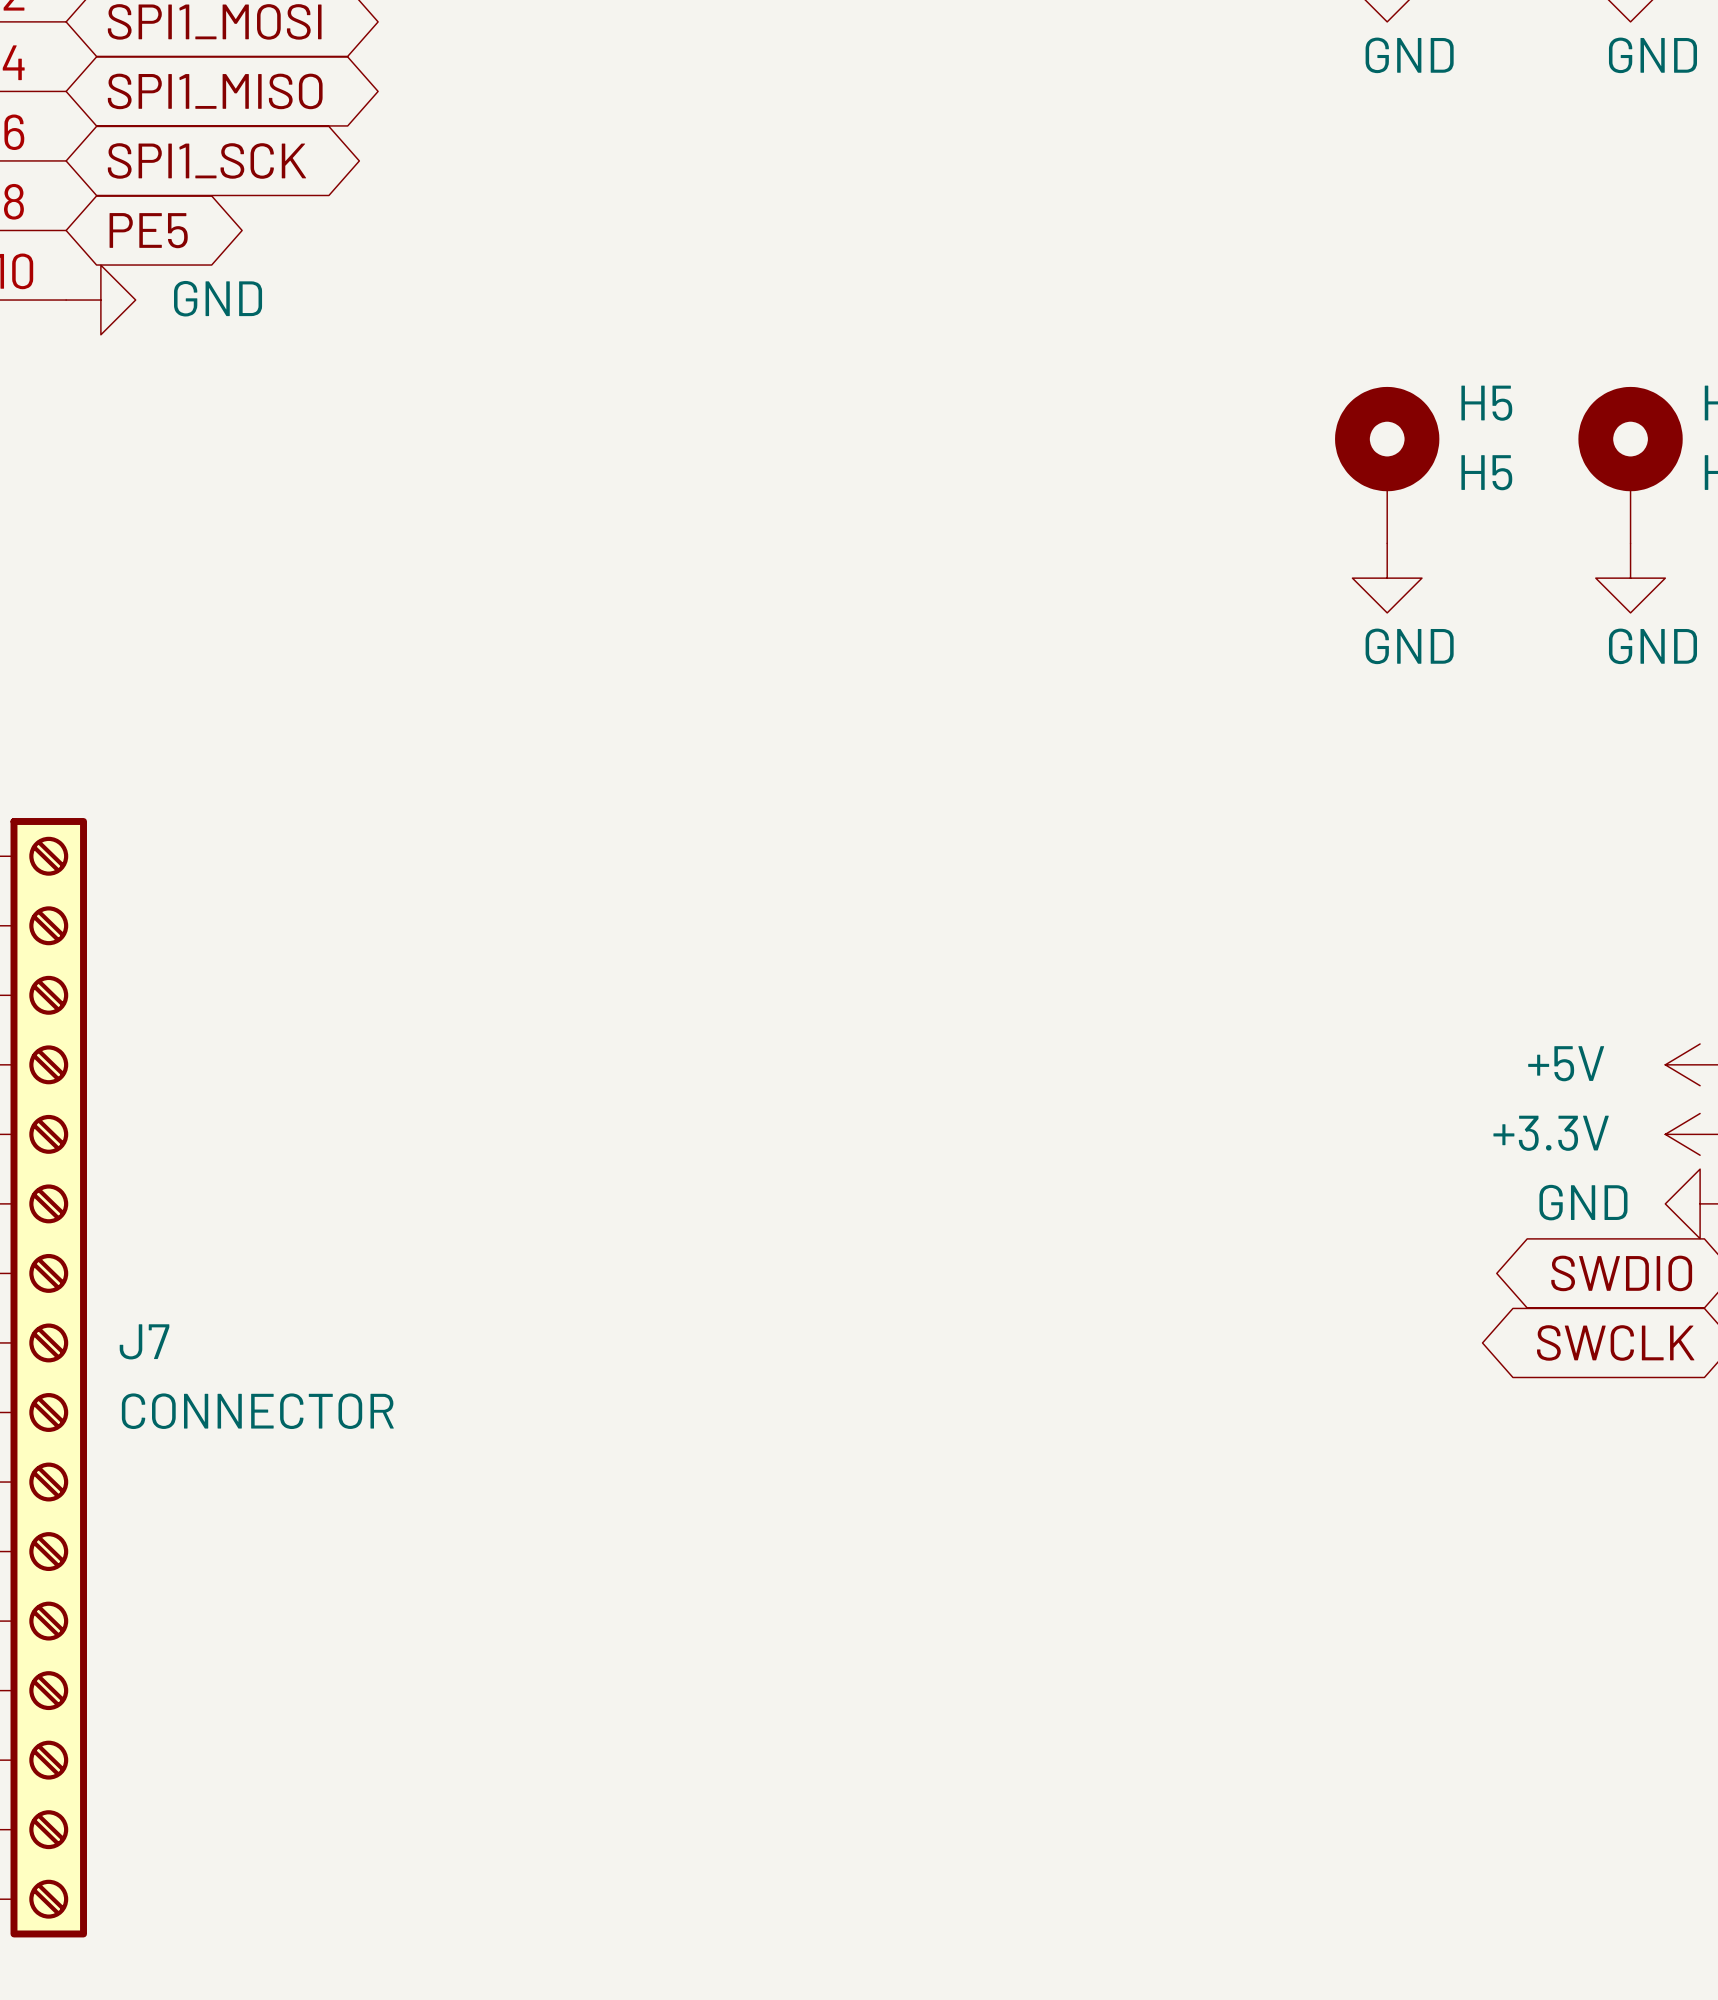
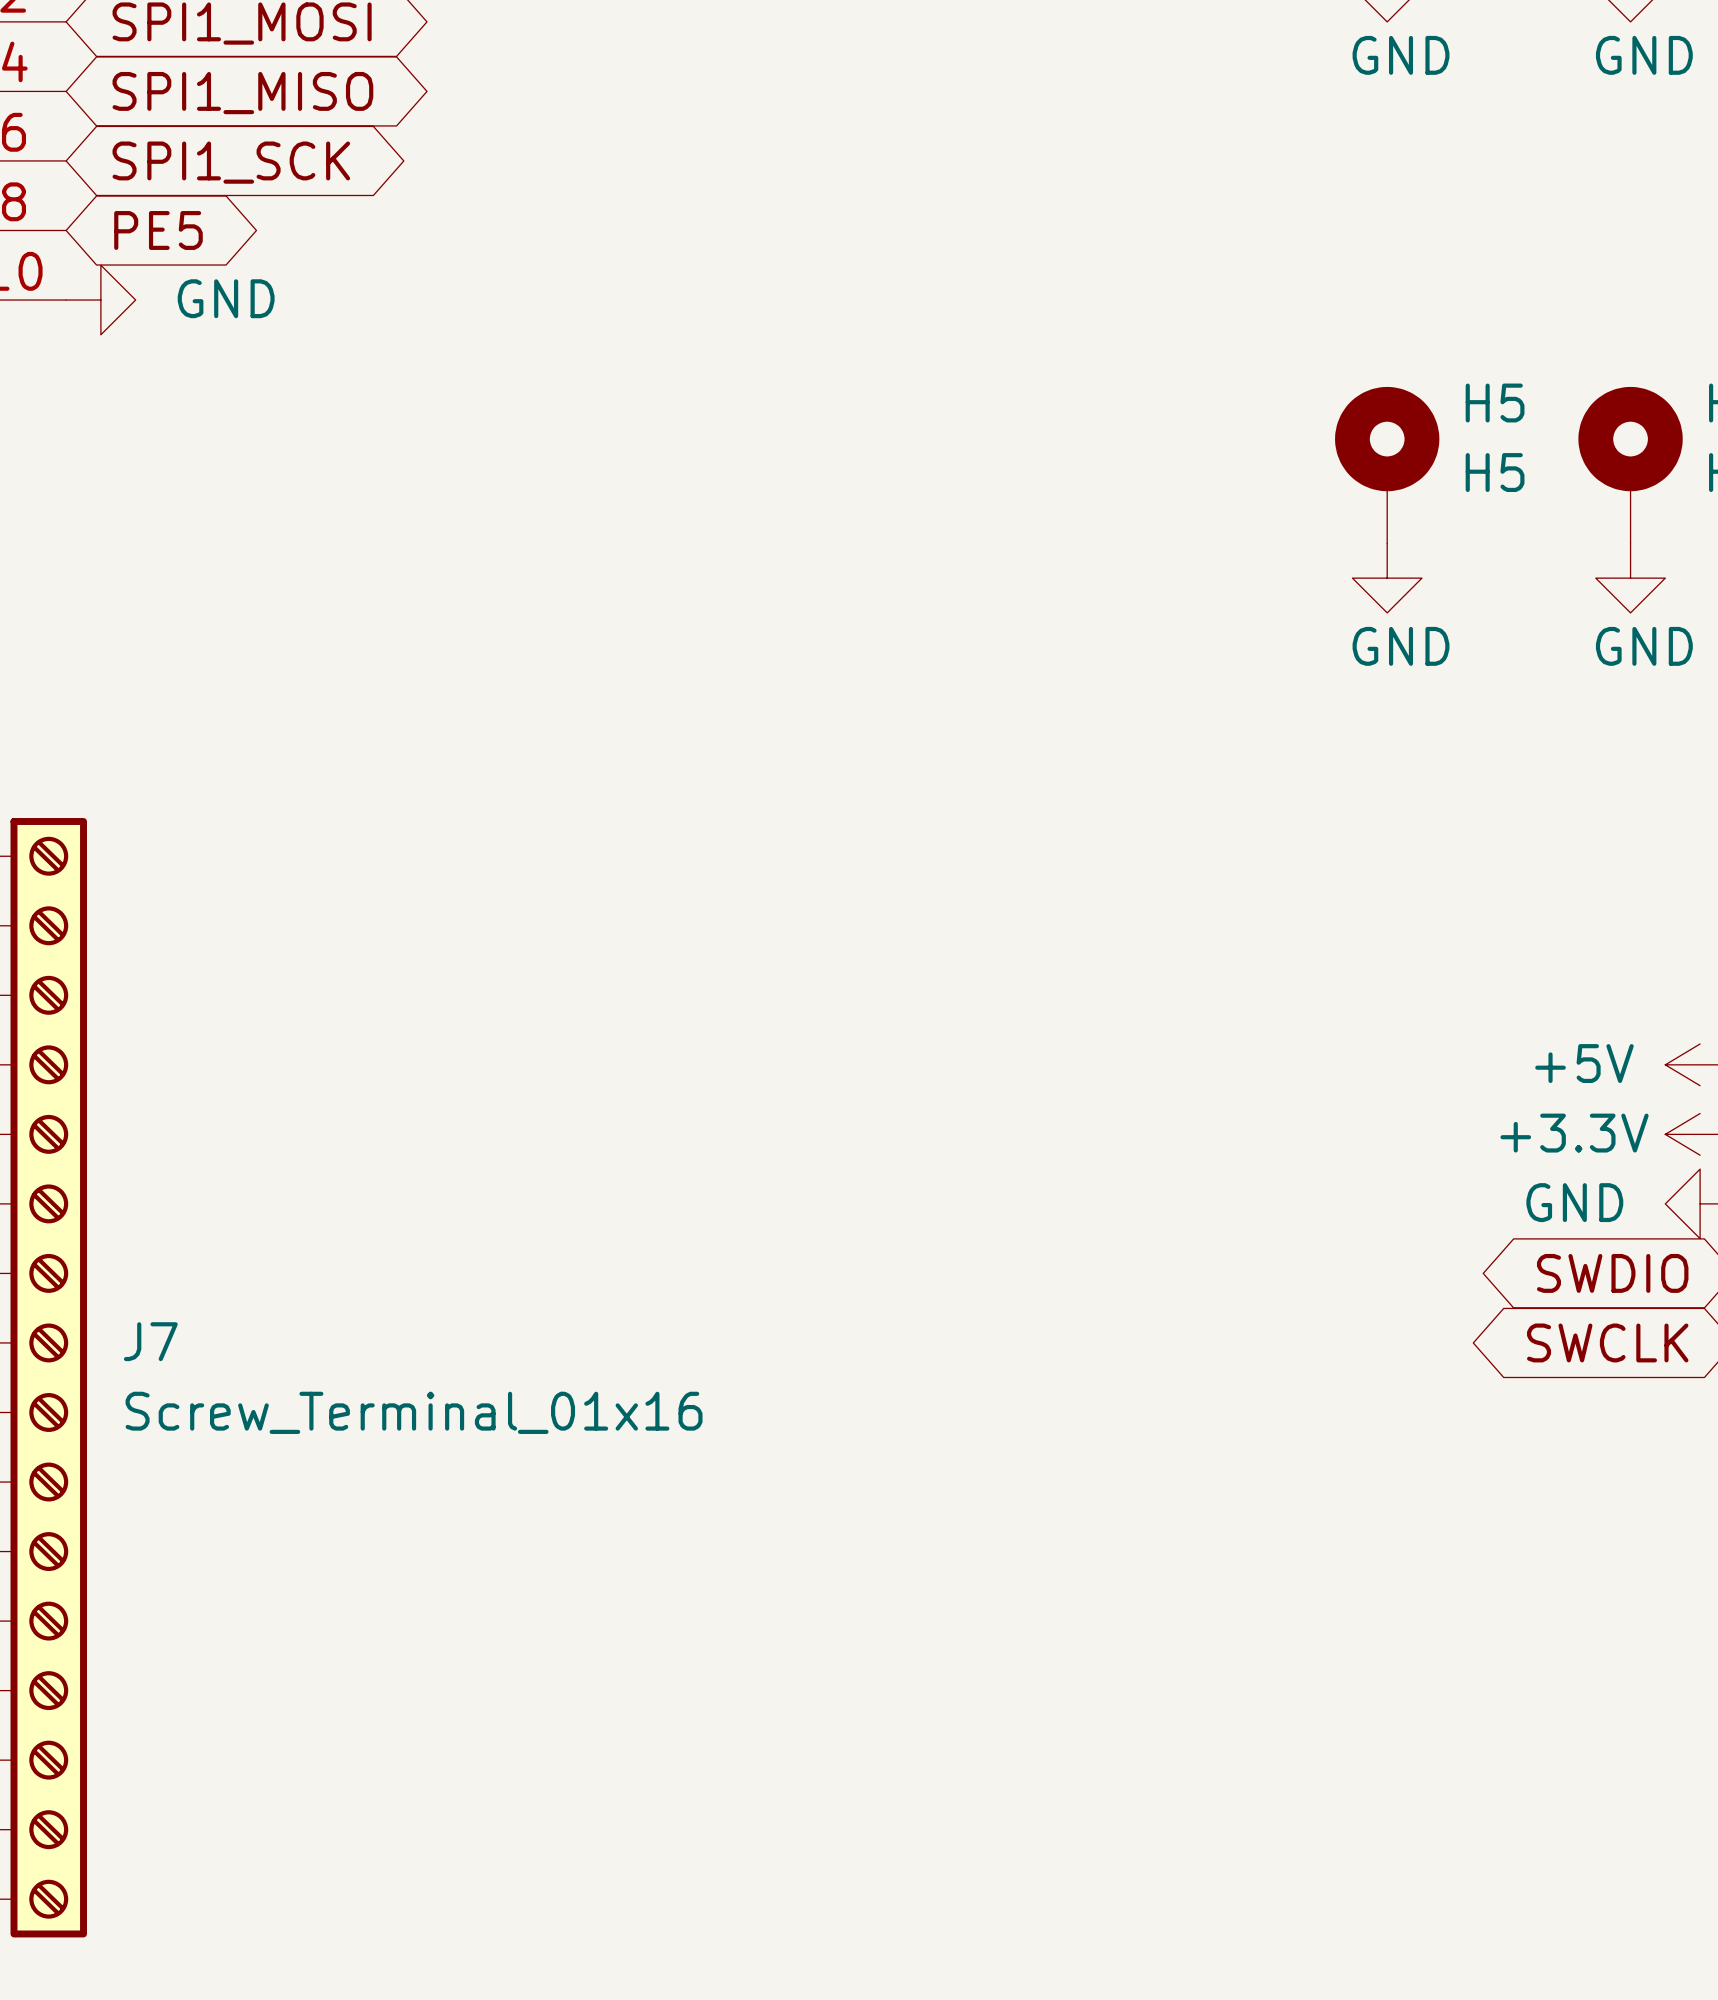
J7 value: CONNECTOR (257, 1411) -> Screw_Terminal_01x16 (414, 1412)

